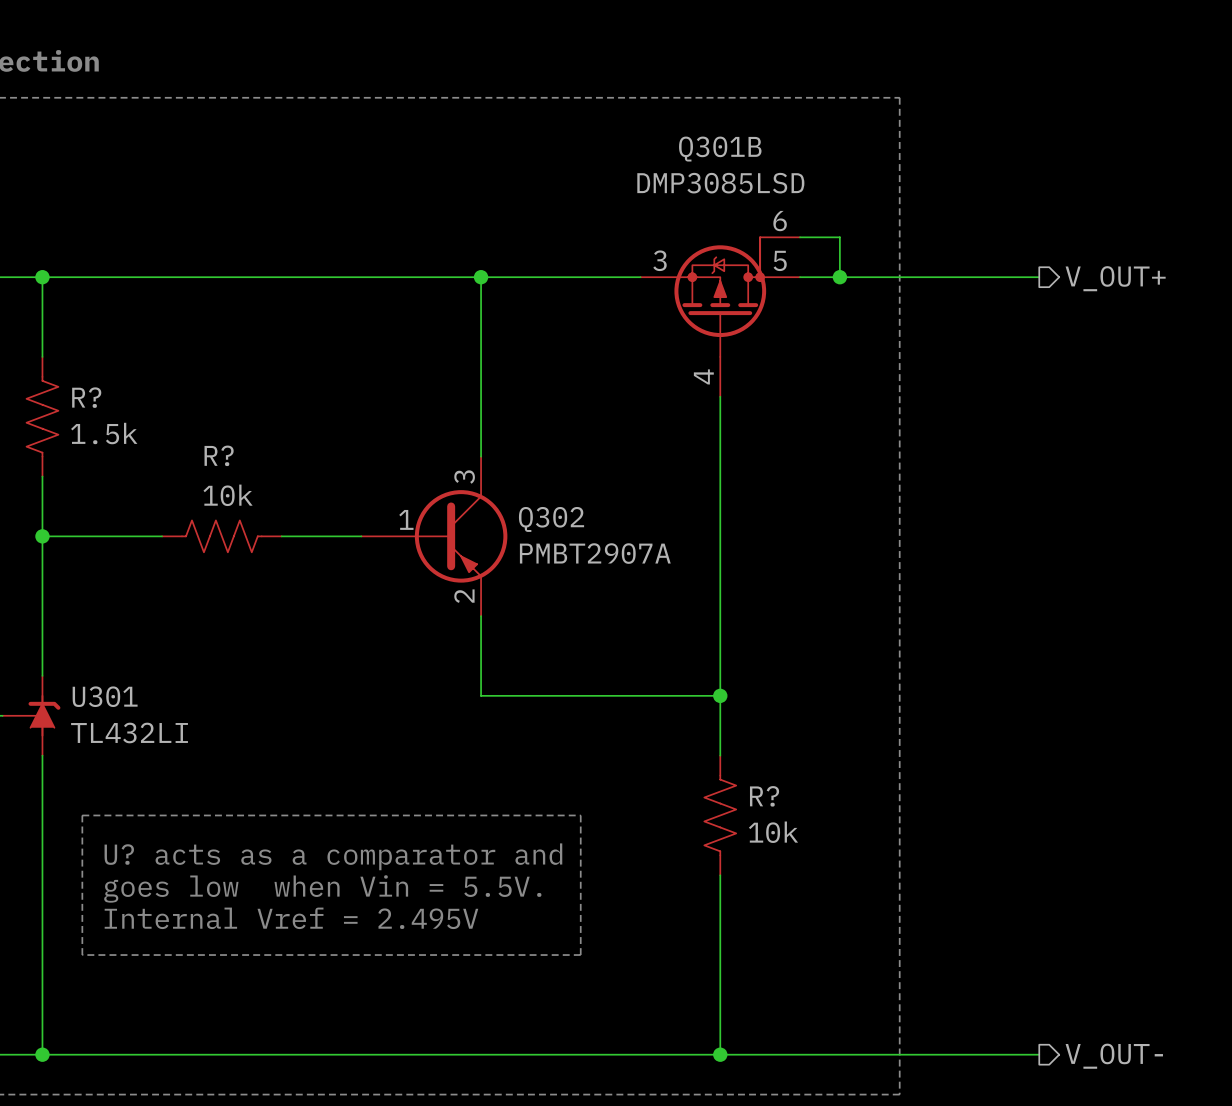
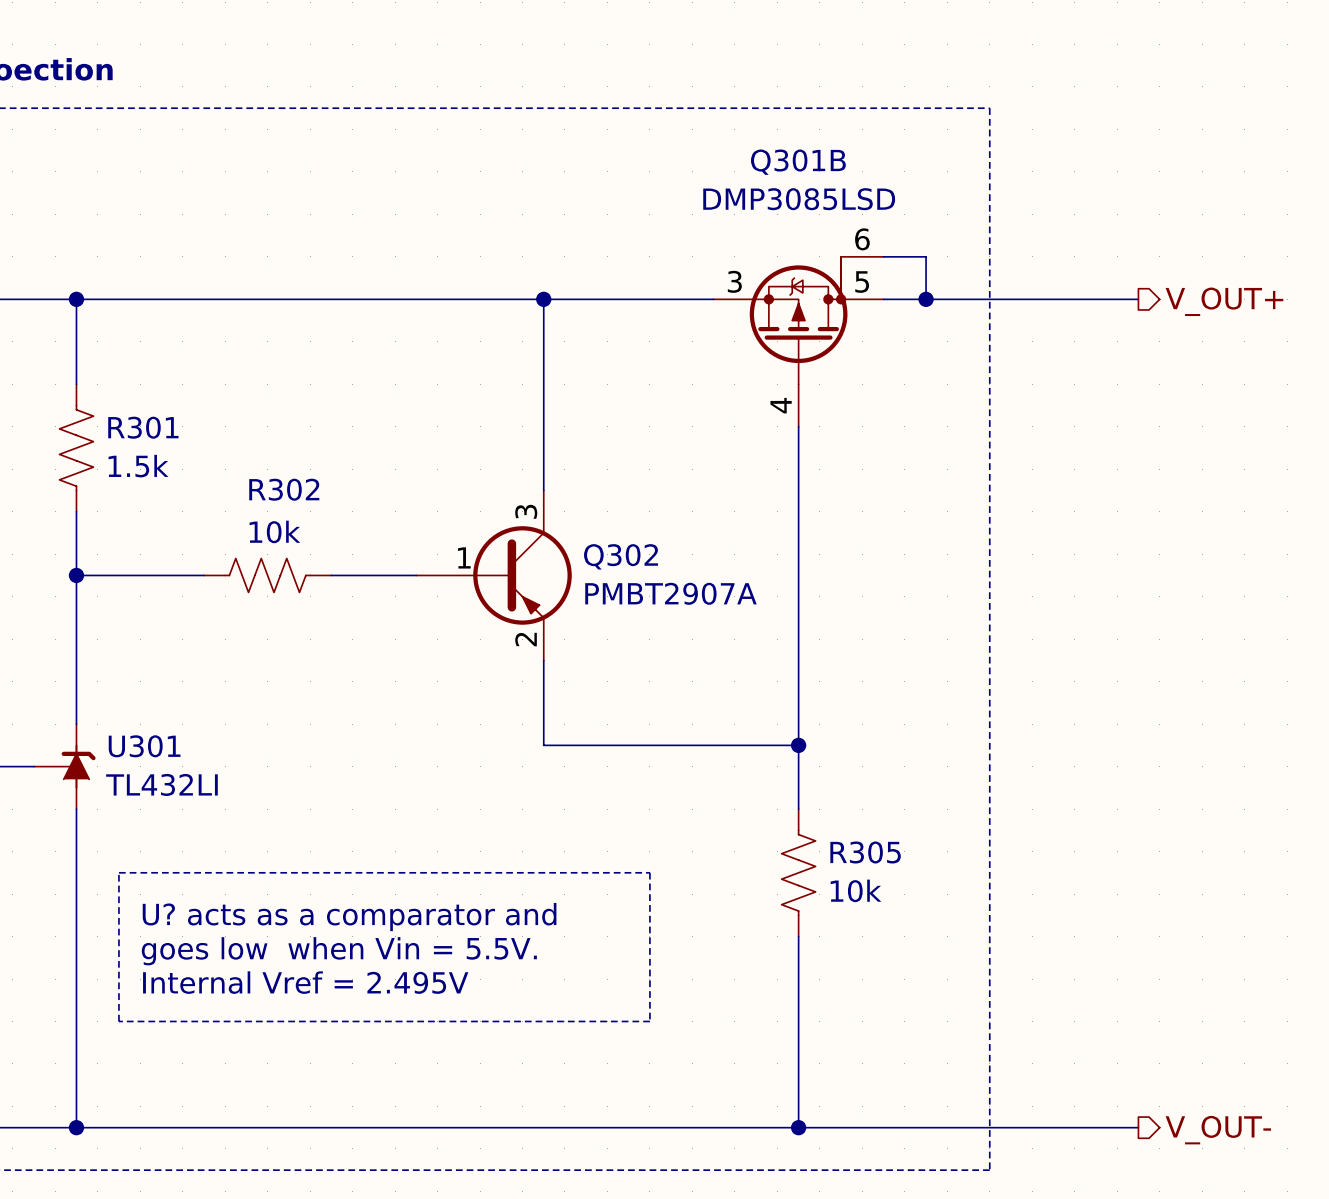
R? name: R? (86, 397) -> R301 (143, 427)
R? name: R? (219, 455) -> R302 (284, 489)
R? name: R? (764, 796) -> R305 (865, 852)

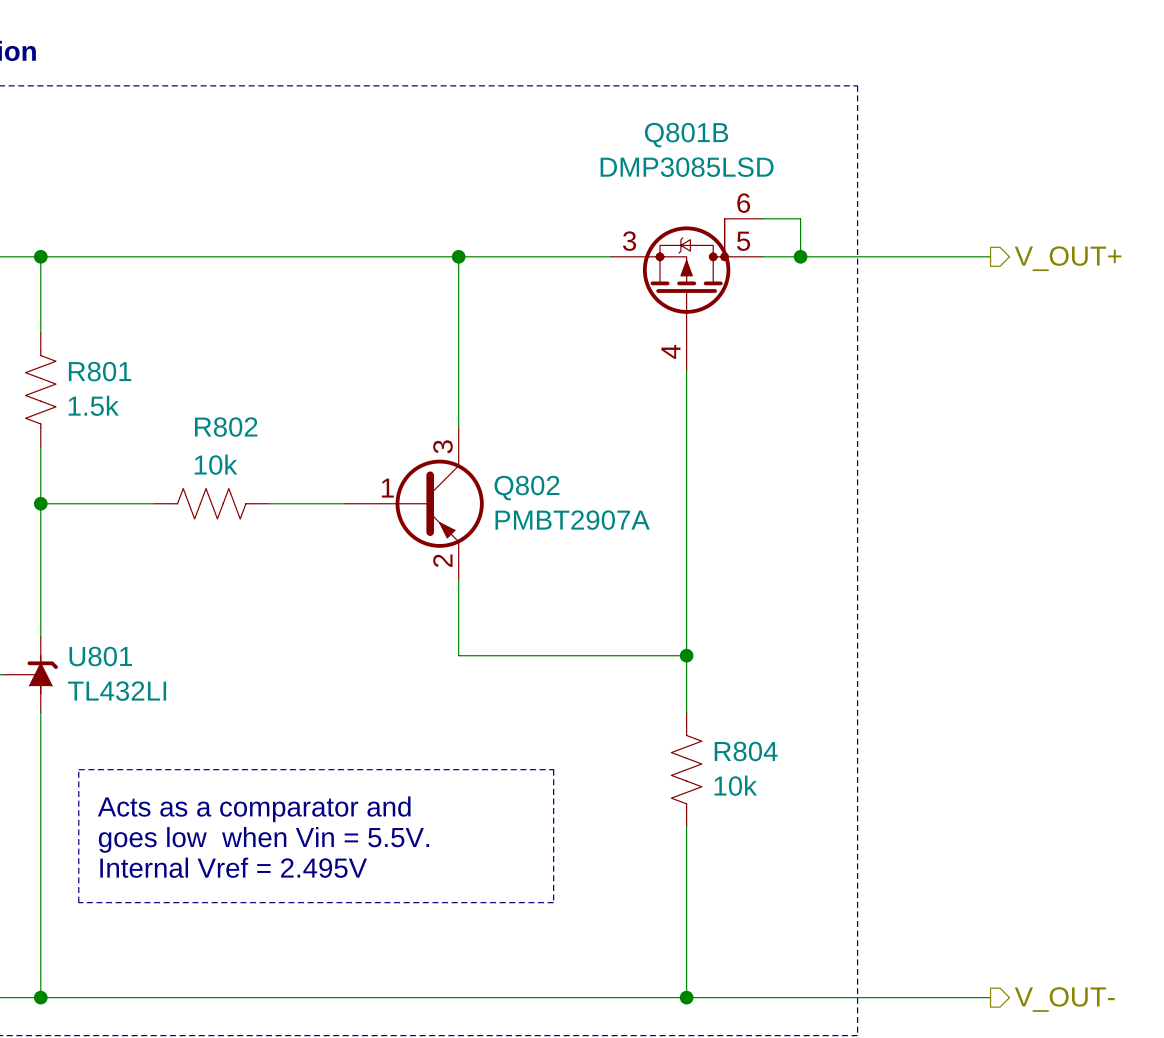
Q301B name: Q301B (798, 162) -> Q801B (686, 135)
R301 name: R301 (143, 427) -> R801 (100, 371)
R302 name: R302 (284, 489) -> R802 (226, 427)
Q302 name: Q302 (621, 556) -> Q802 (526, 488)
U301 name: U301 (144, 746) -> U801 (100, 656)
R305 name: R305 (865, 852) -> R804 (746, 751)
text: U? acts as a comparator and (349, 917) -> Acts as a comparator and (254, 809)

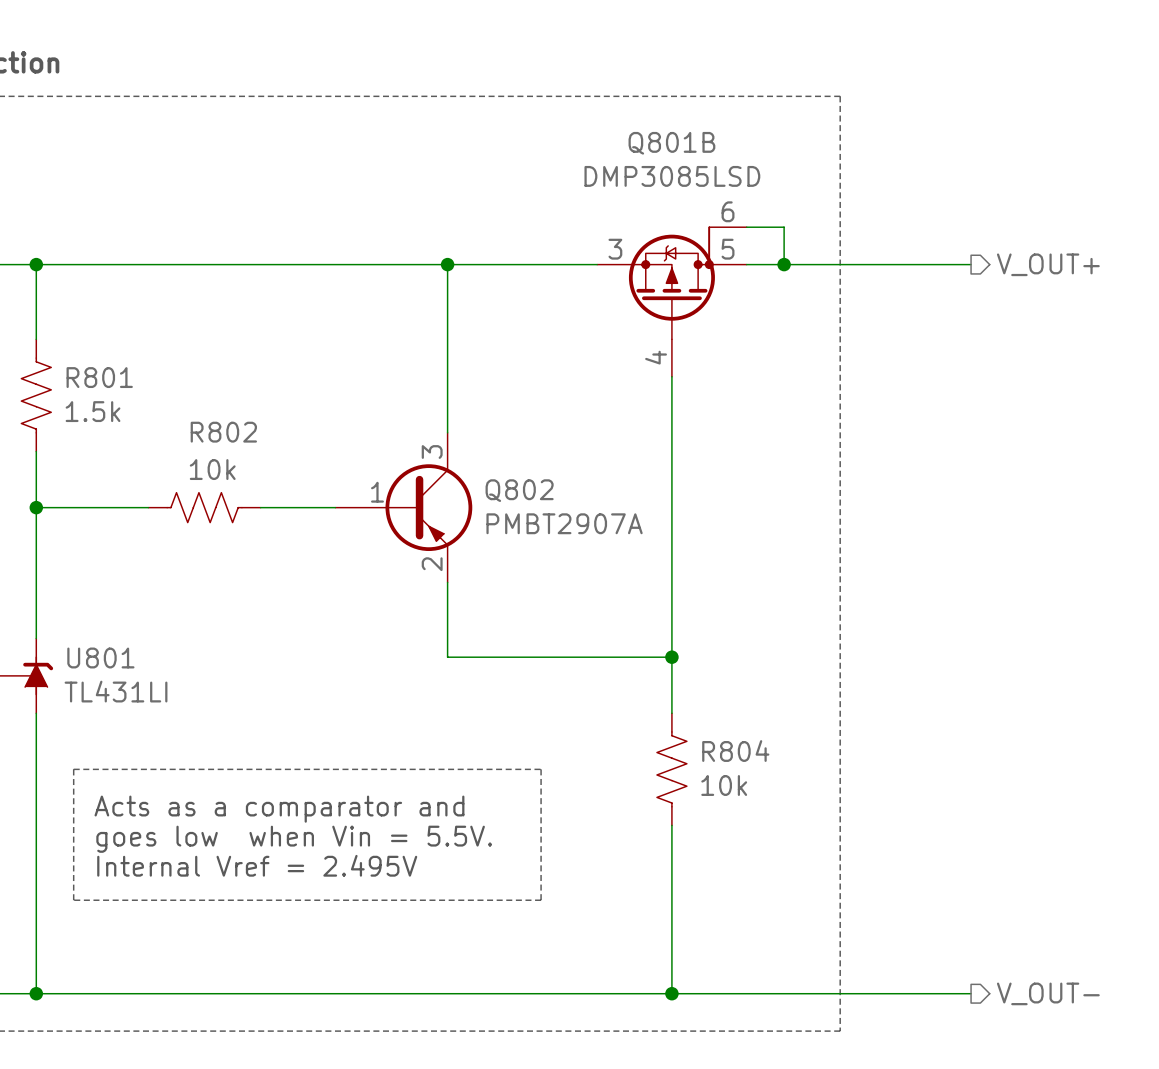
U801 value: TL432LI (117, 691) -> TL431LI (116, 691)

